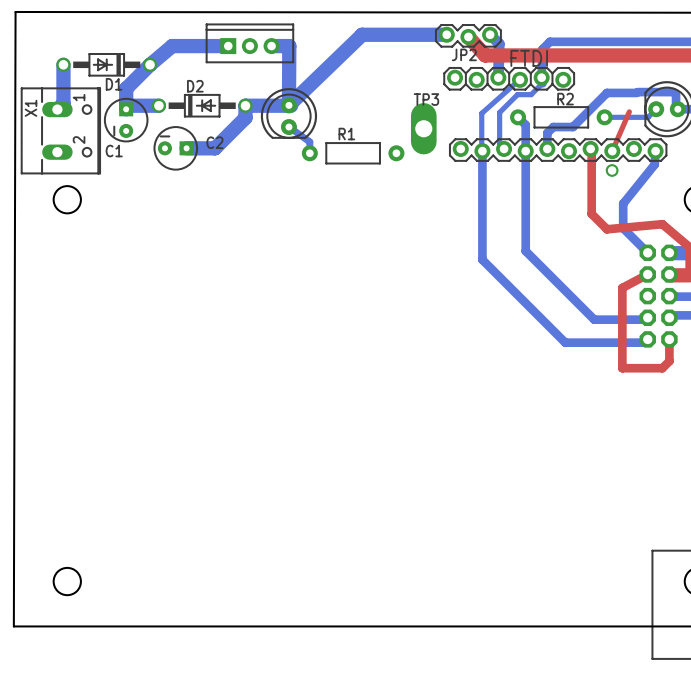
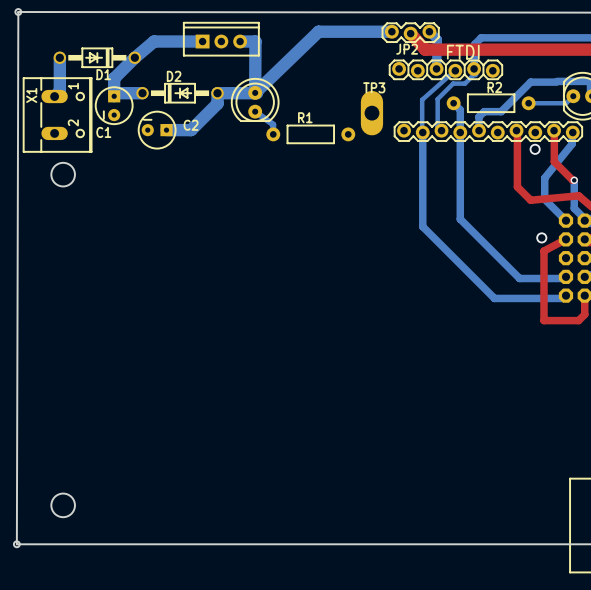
hole: none -> (18, 12)
top track: (629, 111) (612, 151) -> none
top track: none -> (554, 130) (554, 161) (574, 180)
bottom track: none -> (574, 180) (574, 208) (584, 220)
via: none -> (574, 180)
via: none -> (541, 237)
hole: none -> (16, 544)

